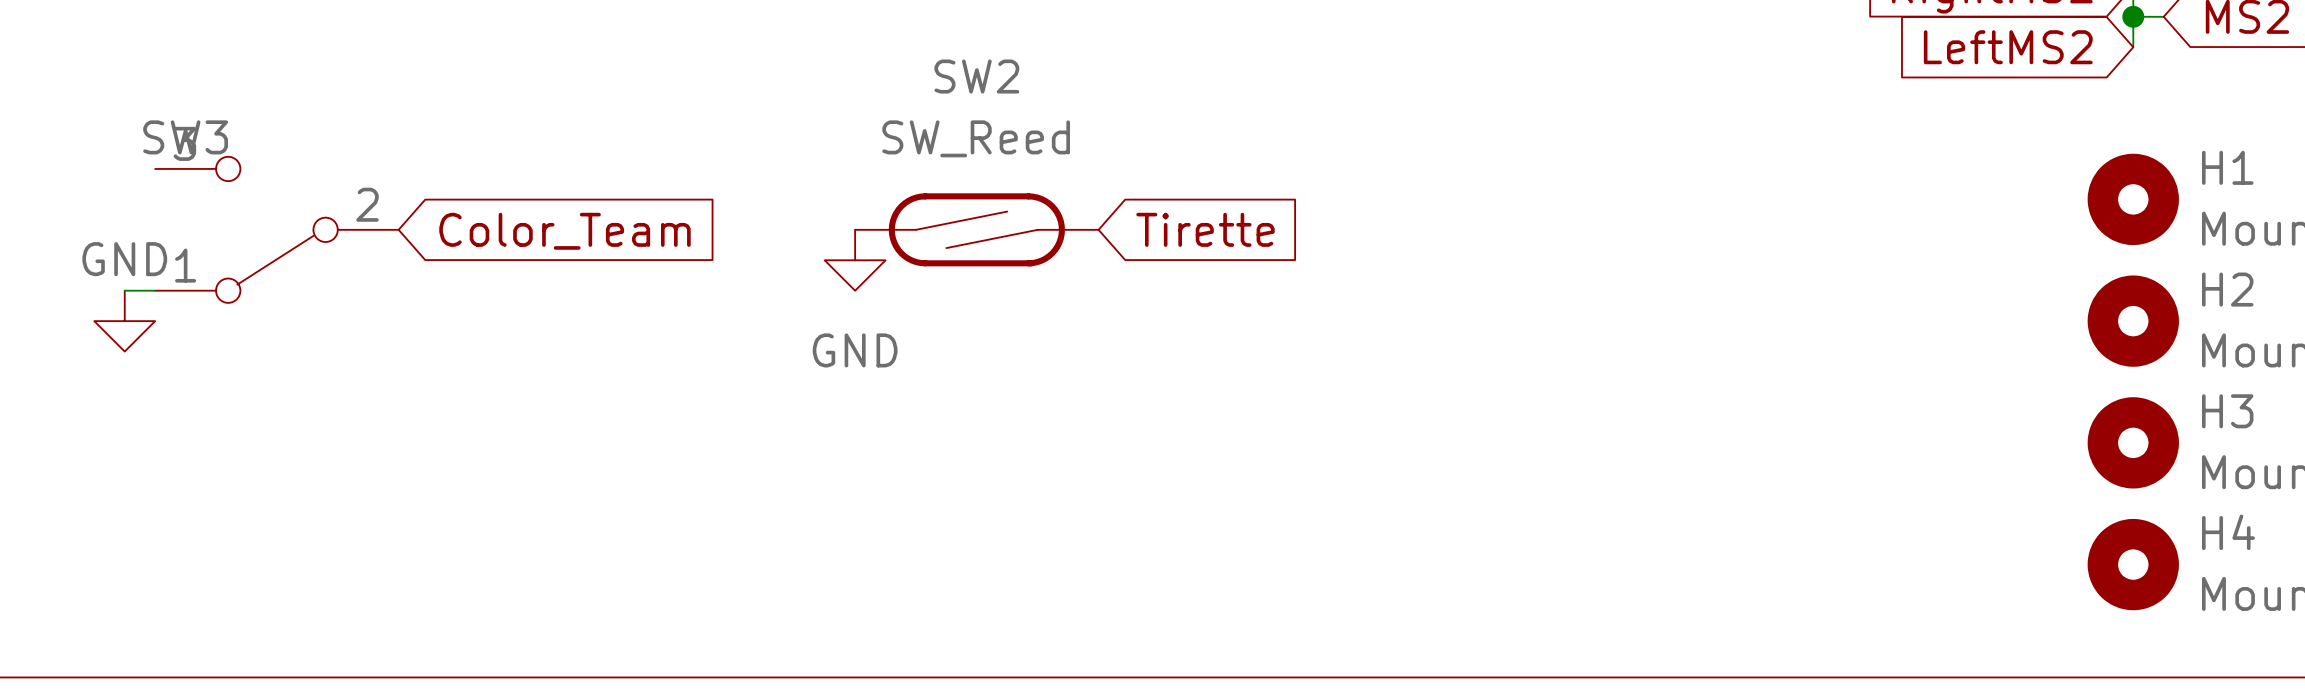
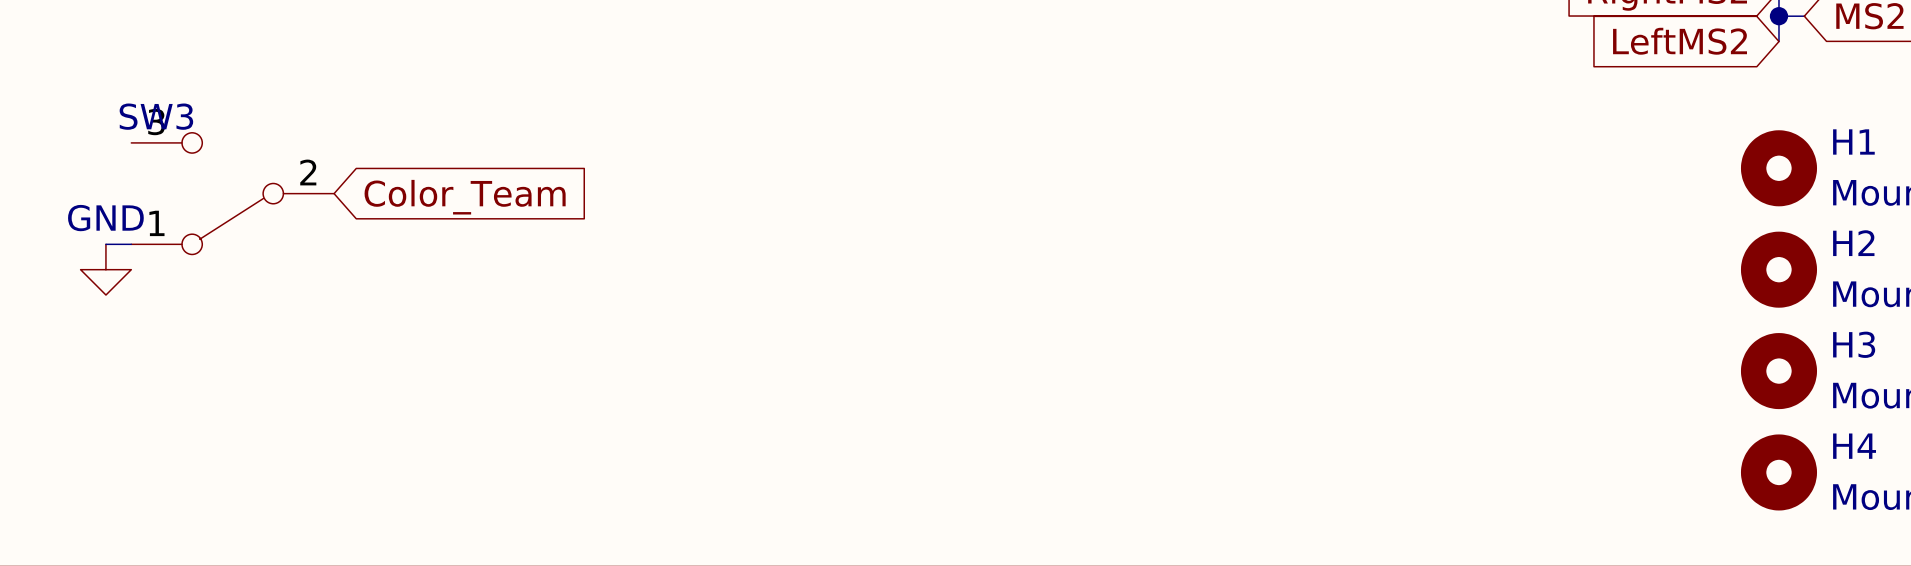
SW2: SW_Reed (976, 229) -> none
global label: Tirette (1205, 229) -> none
power symbol: GND (855, 260) -> none

